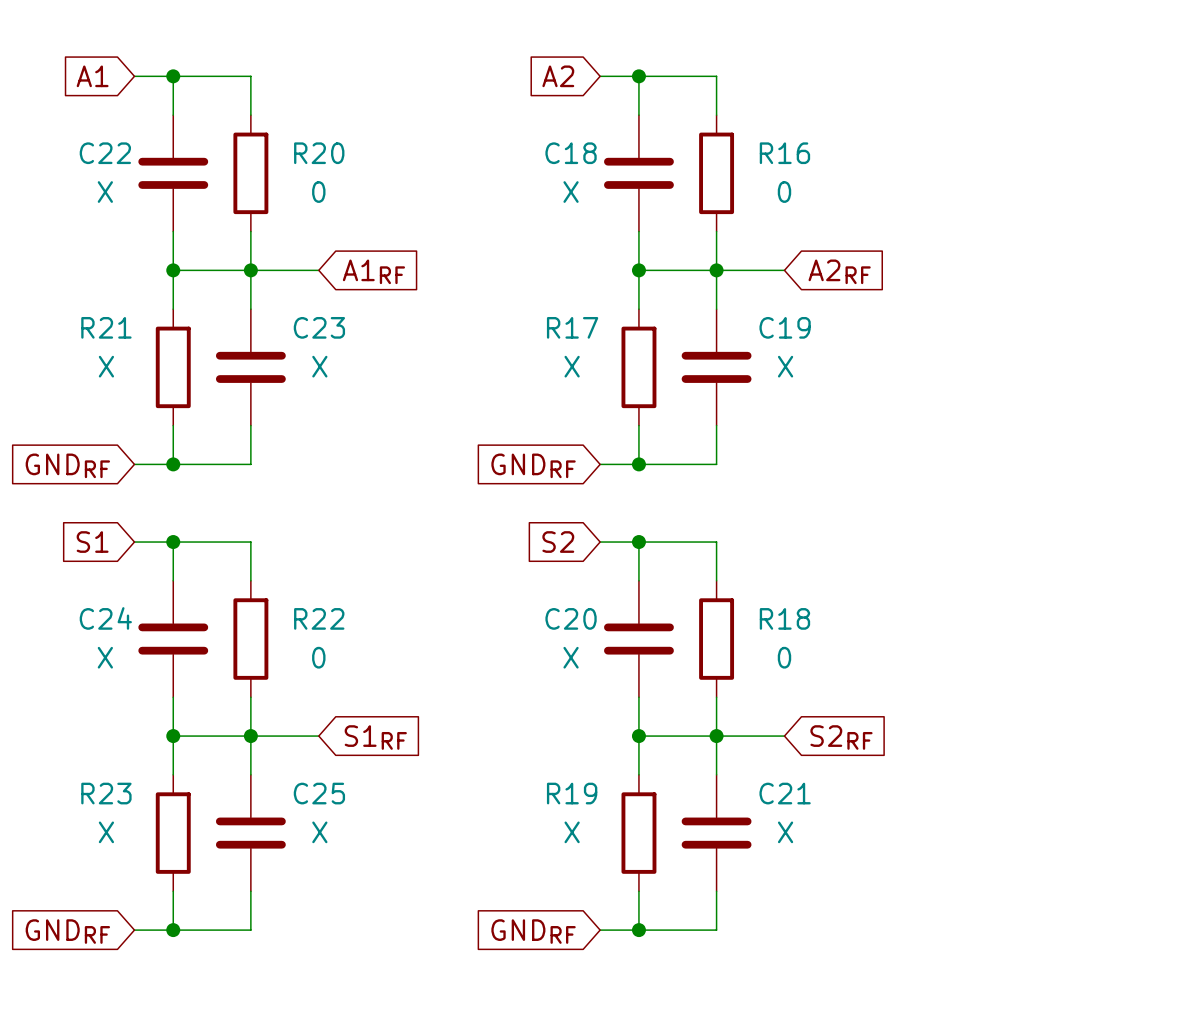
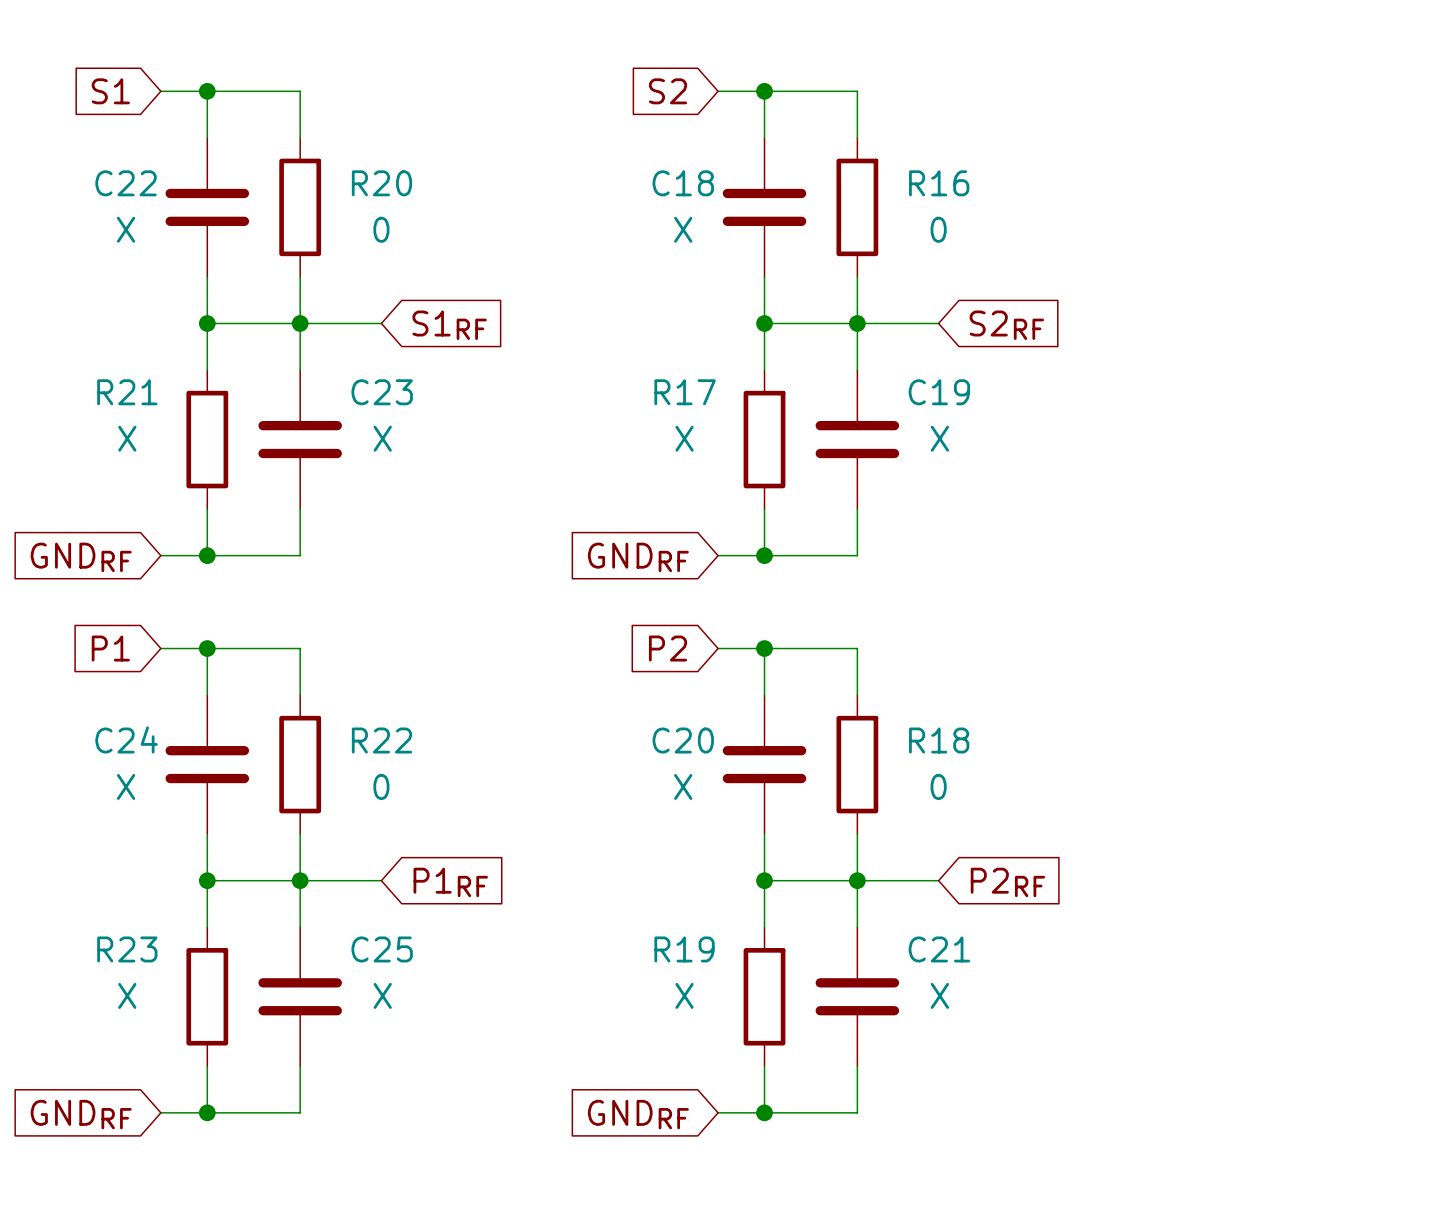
global label: A1 (92, 76) -> S1 (110, 91)
global label: A2 (558, 76) -> S2 (668, 91)
global label: A1RF (373, 271) -> S1RF (449, 325)
global label: A2RF (839, 271) -> S2RF (1006, 325)
global label: S1 (92, 542) -> P1 (110, 648)
global label: S2 (558, 542) -> P2 (668, 648)
global label: S1RF (375, 737) -> P1RF (450, 882)
global label: S2RF (841, 737) -> P2RF (1007, 882)

